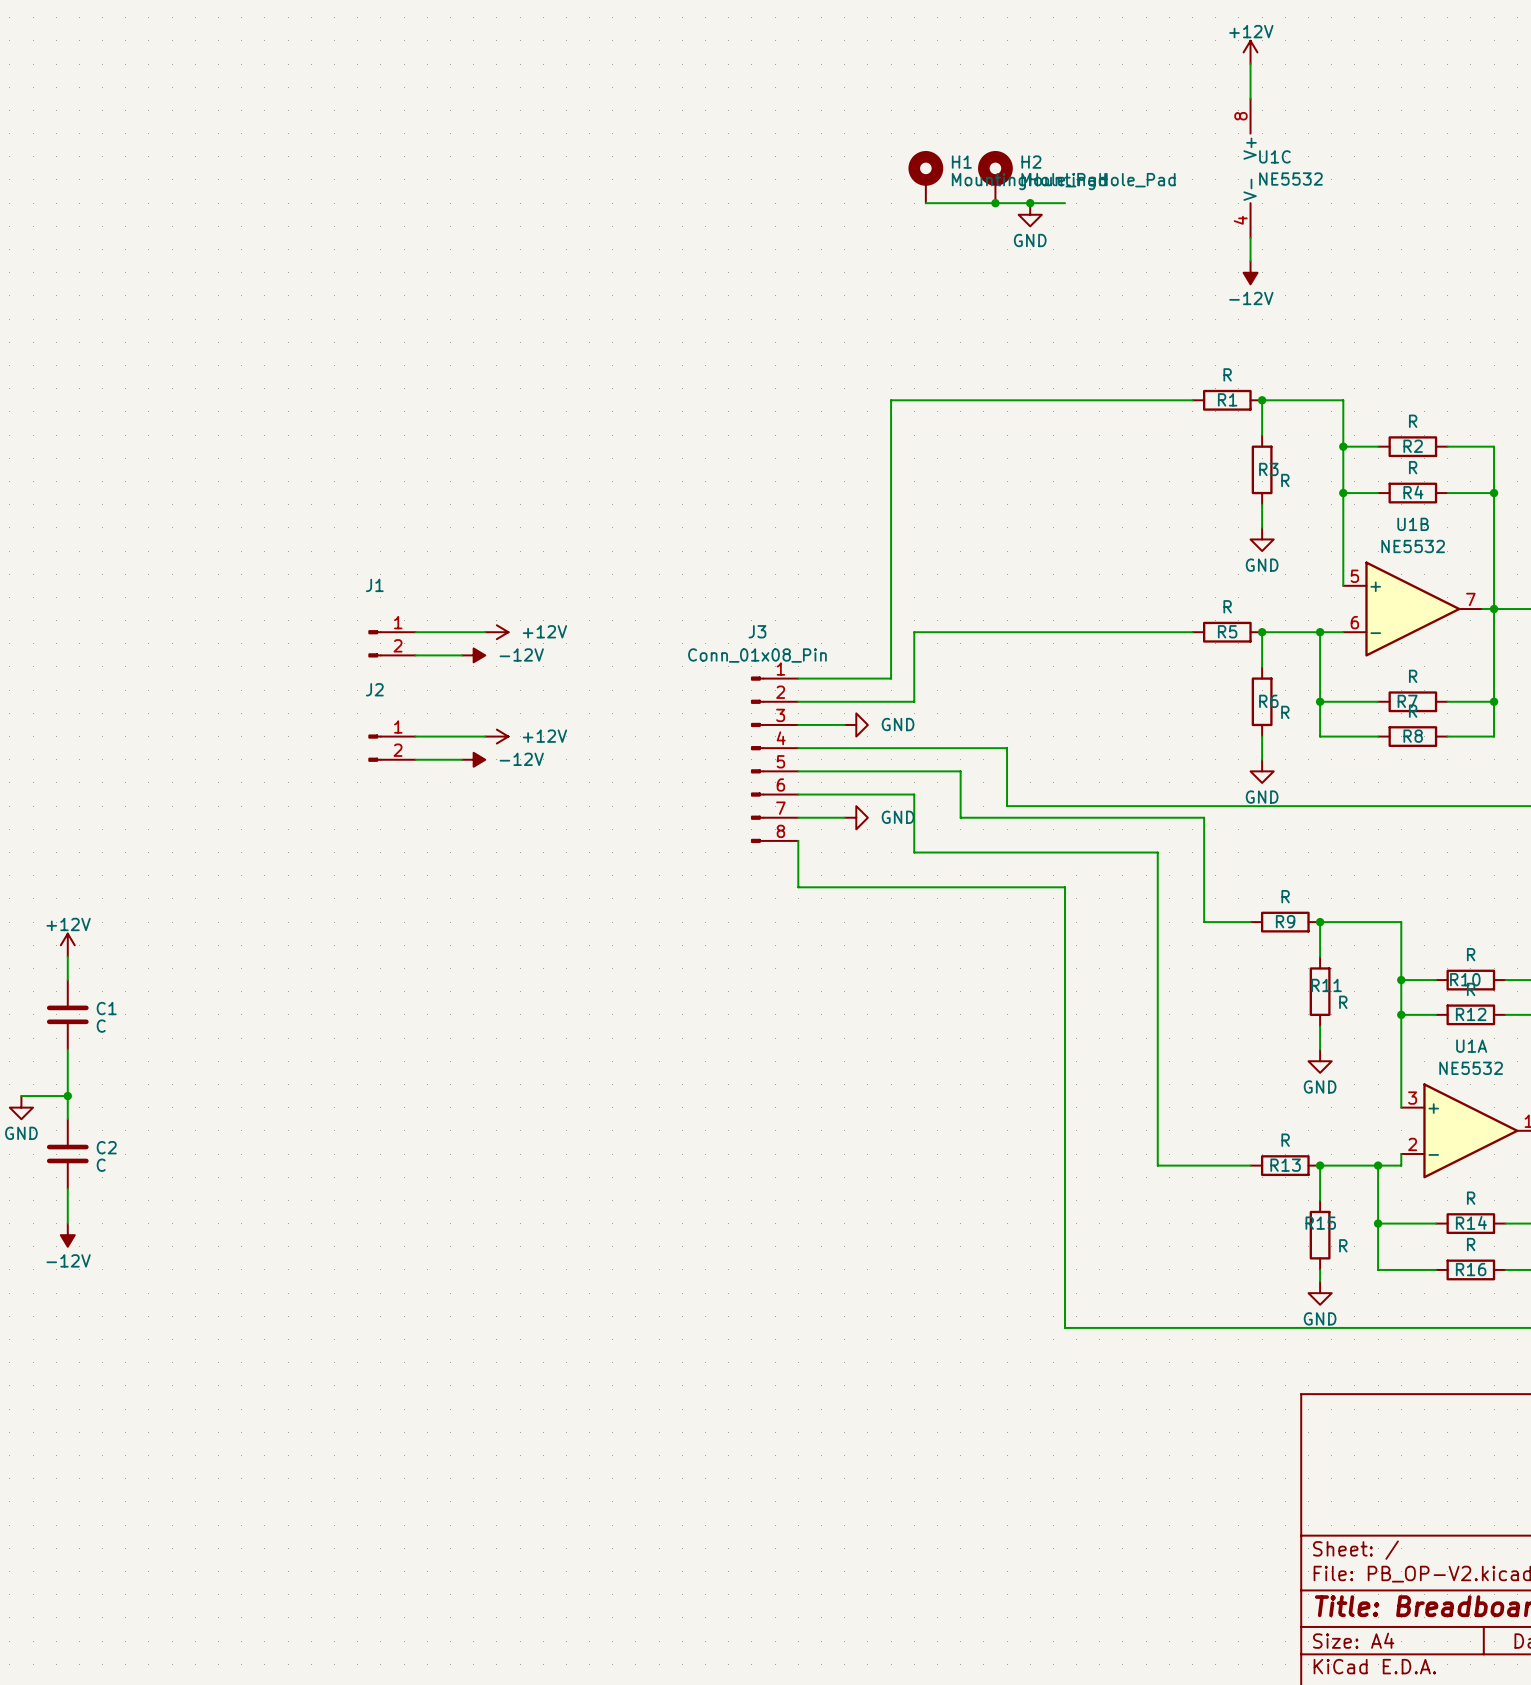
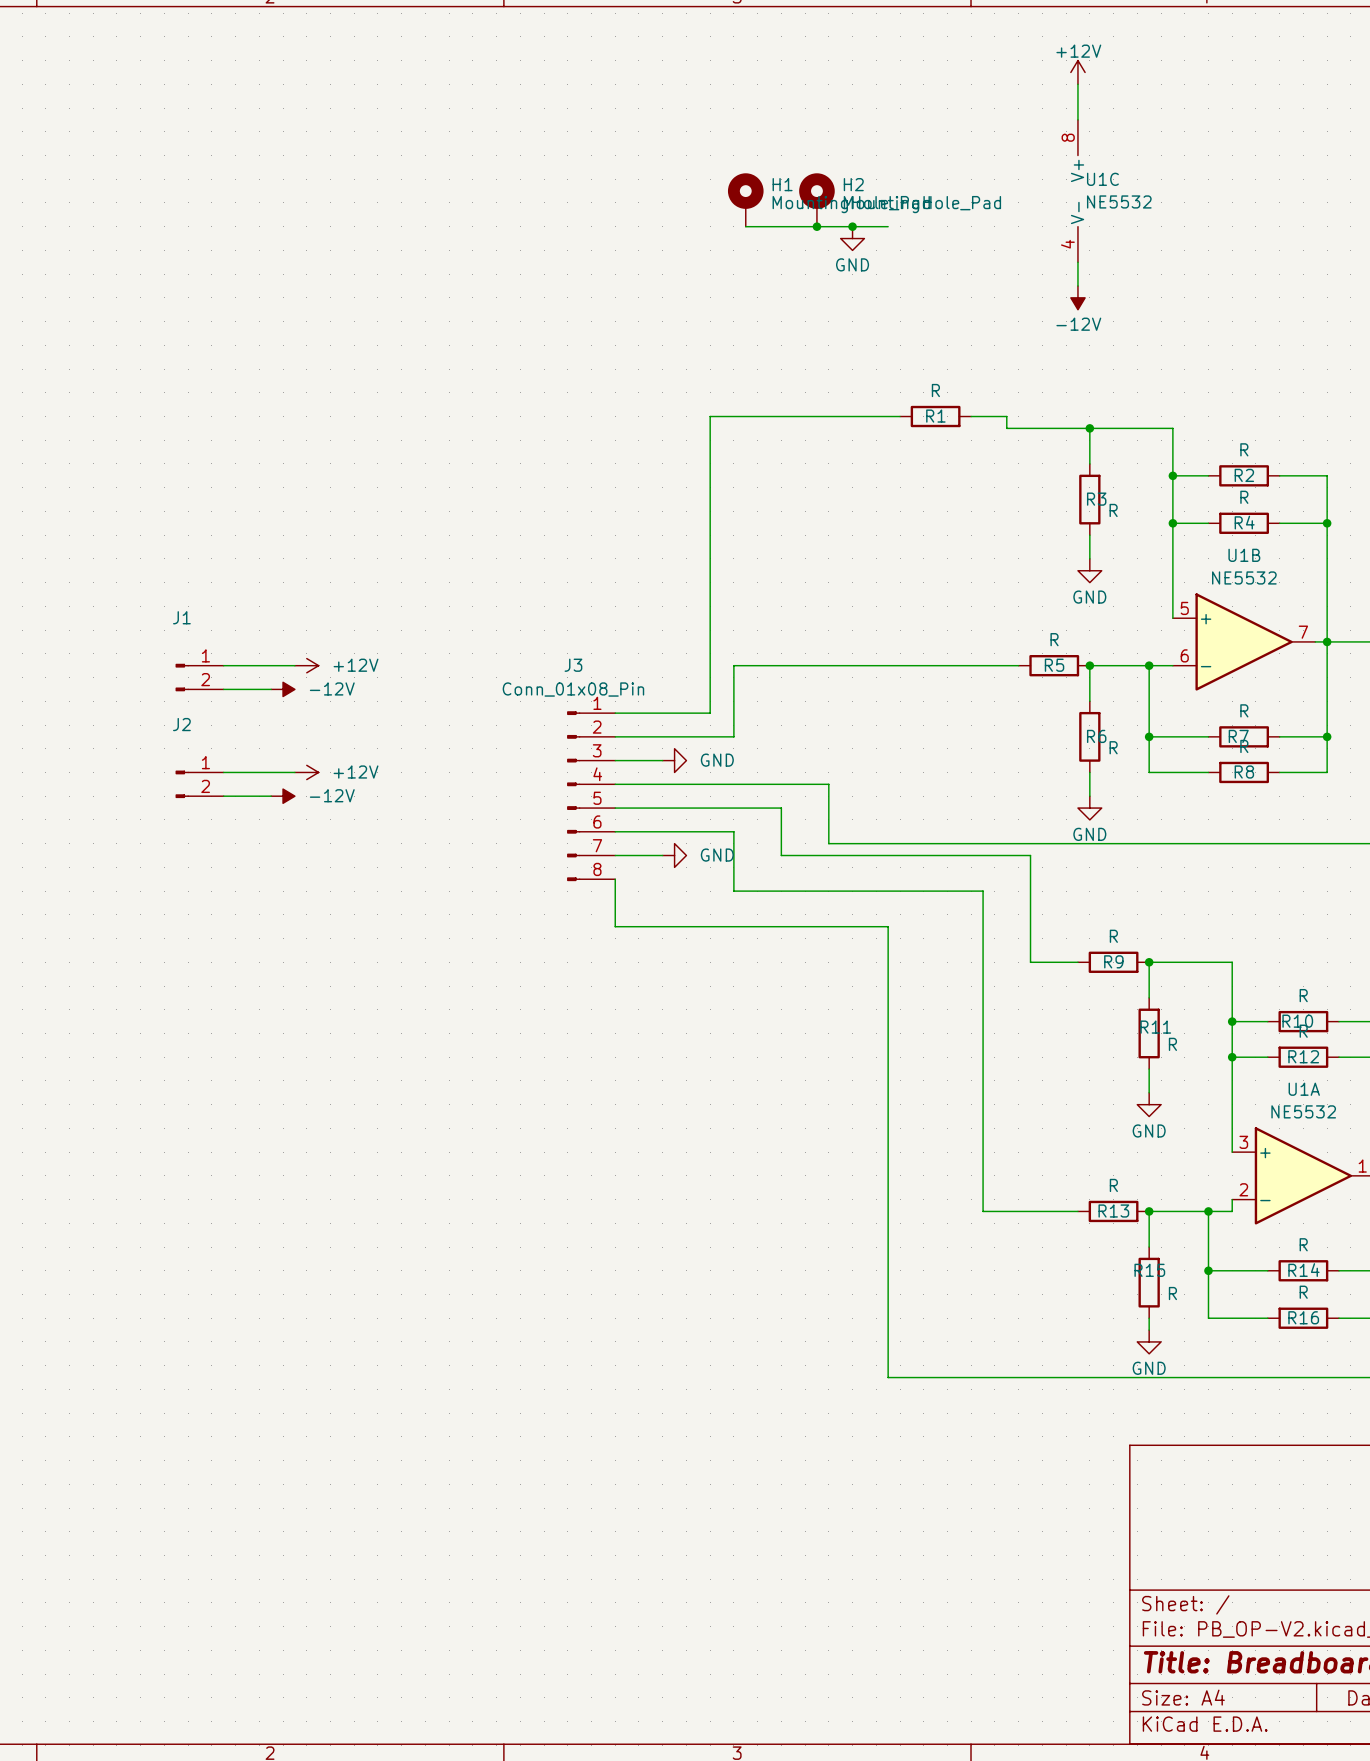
wire: none -> (971, 416) (1006, 416) (1006, 428)
wire: (891, 400) (1180, 400) -> (710, 428) (710, 416) (900, 416)
wire: none -> (1018, 428) (1089, 428)
R1 position: (1227, 400) -> (935, 416)

